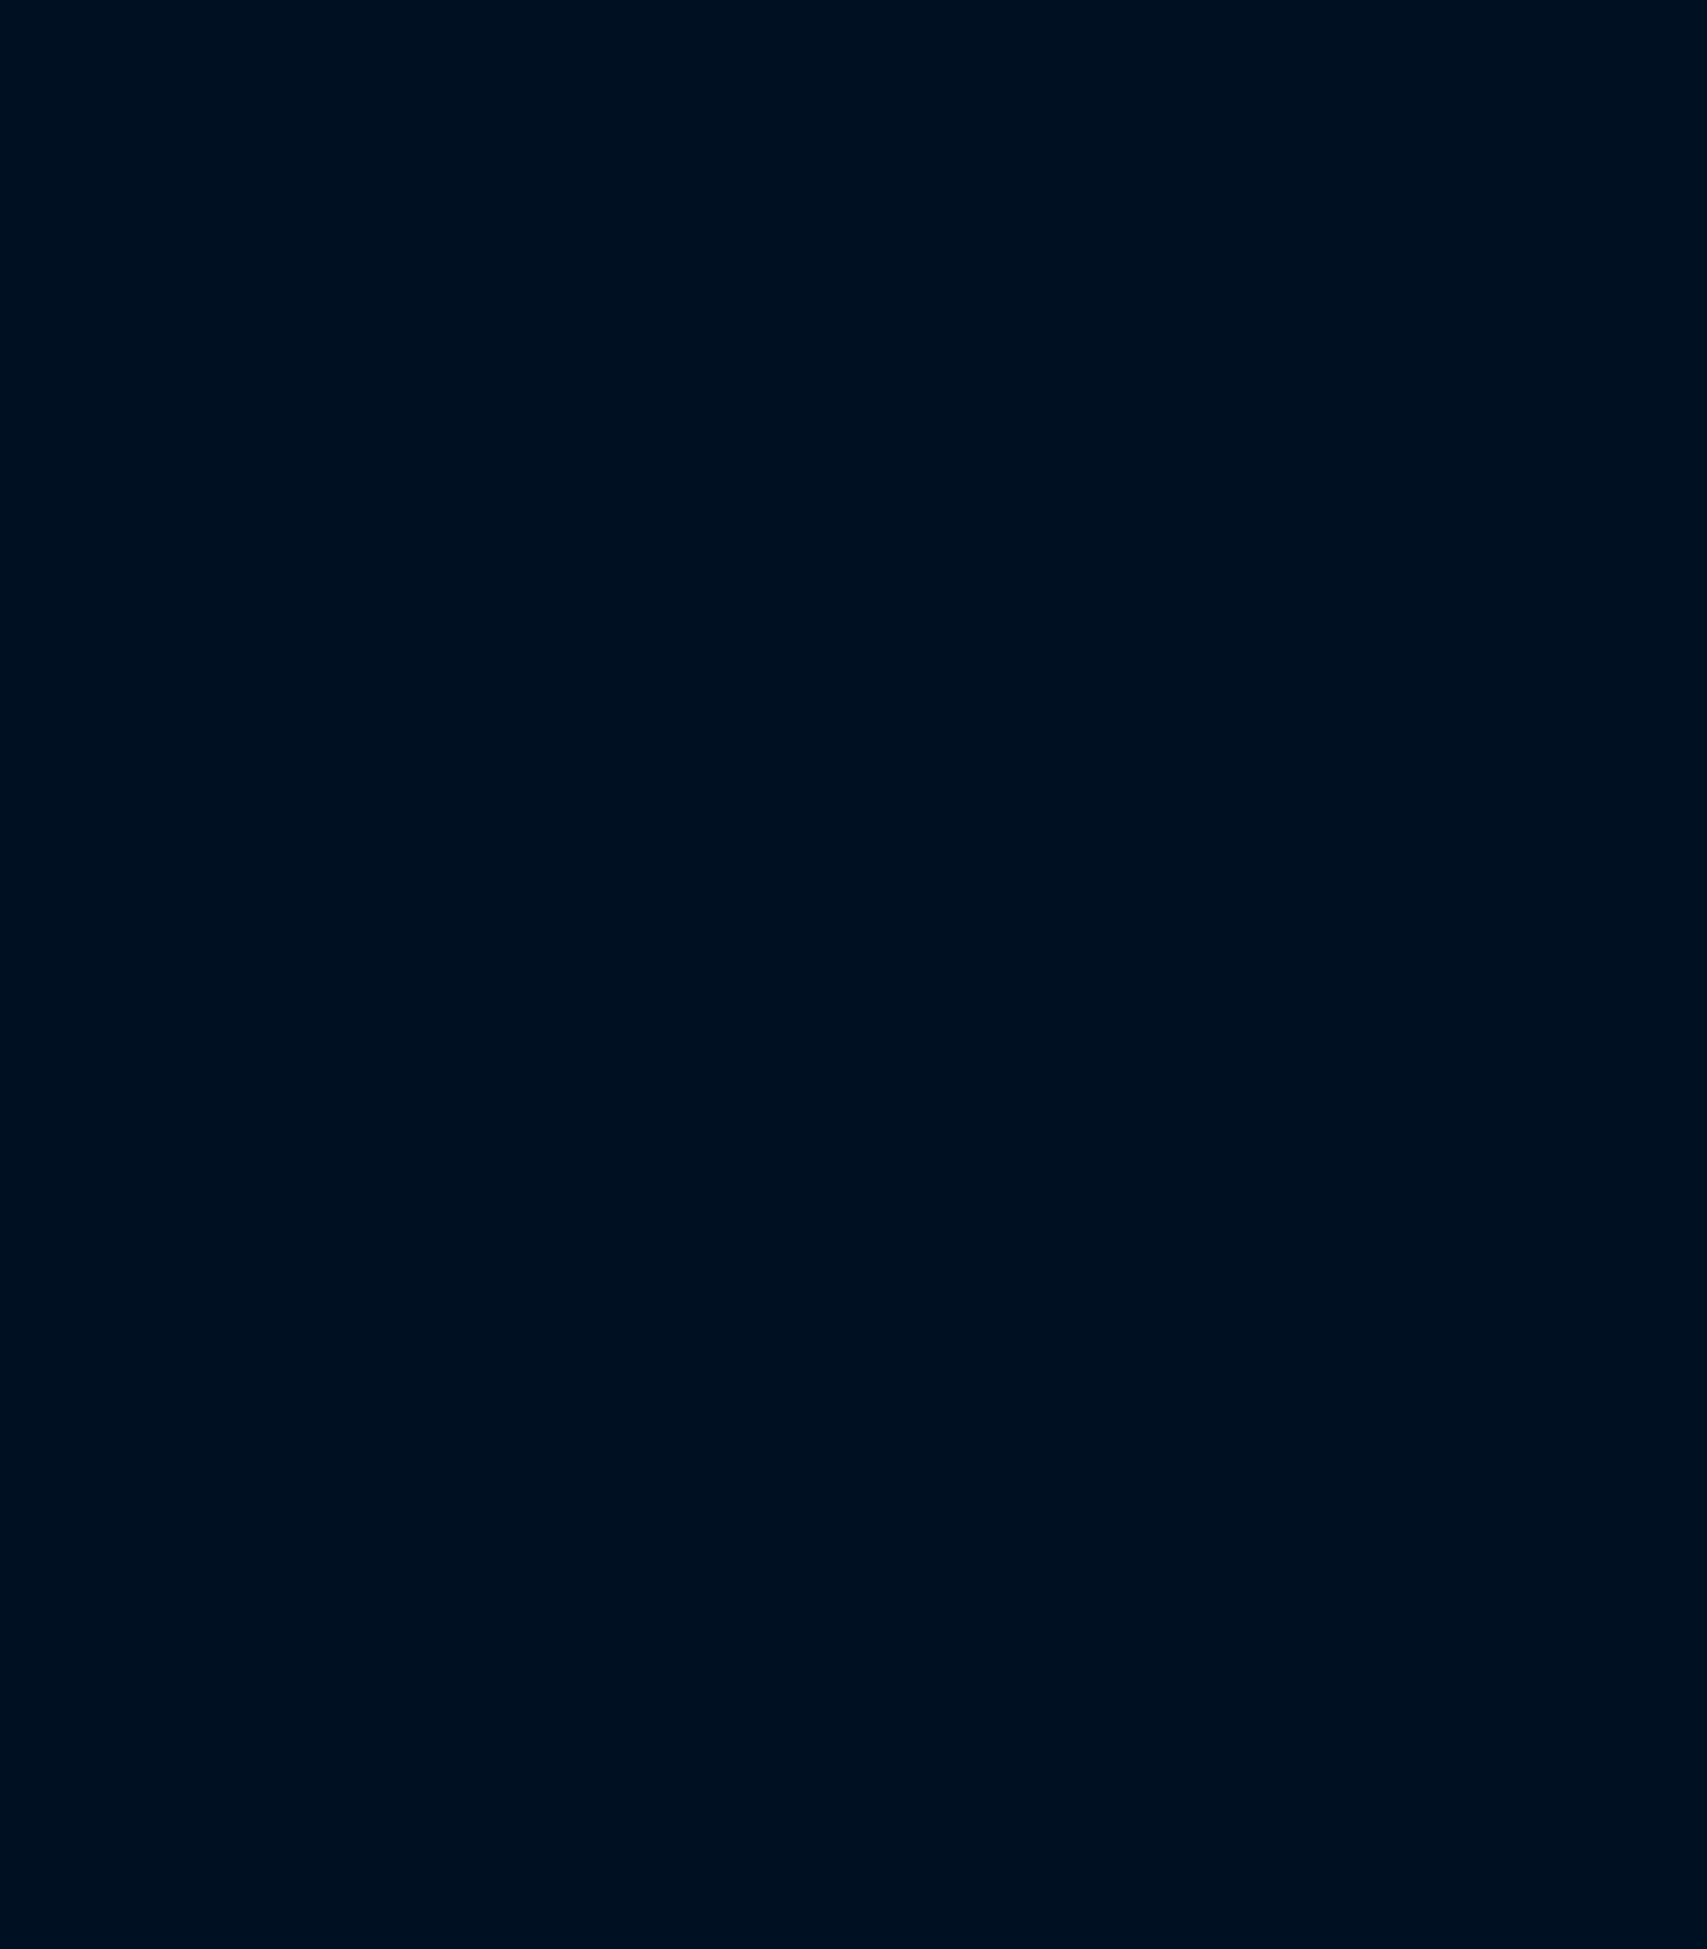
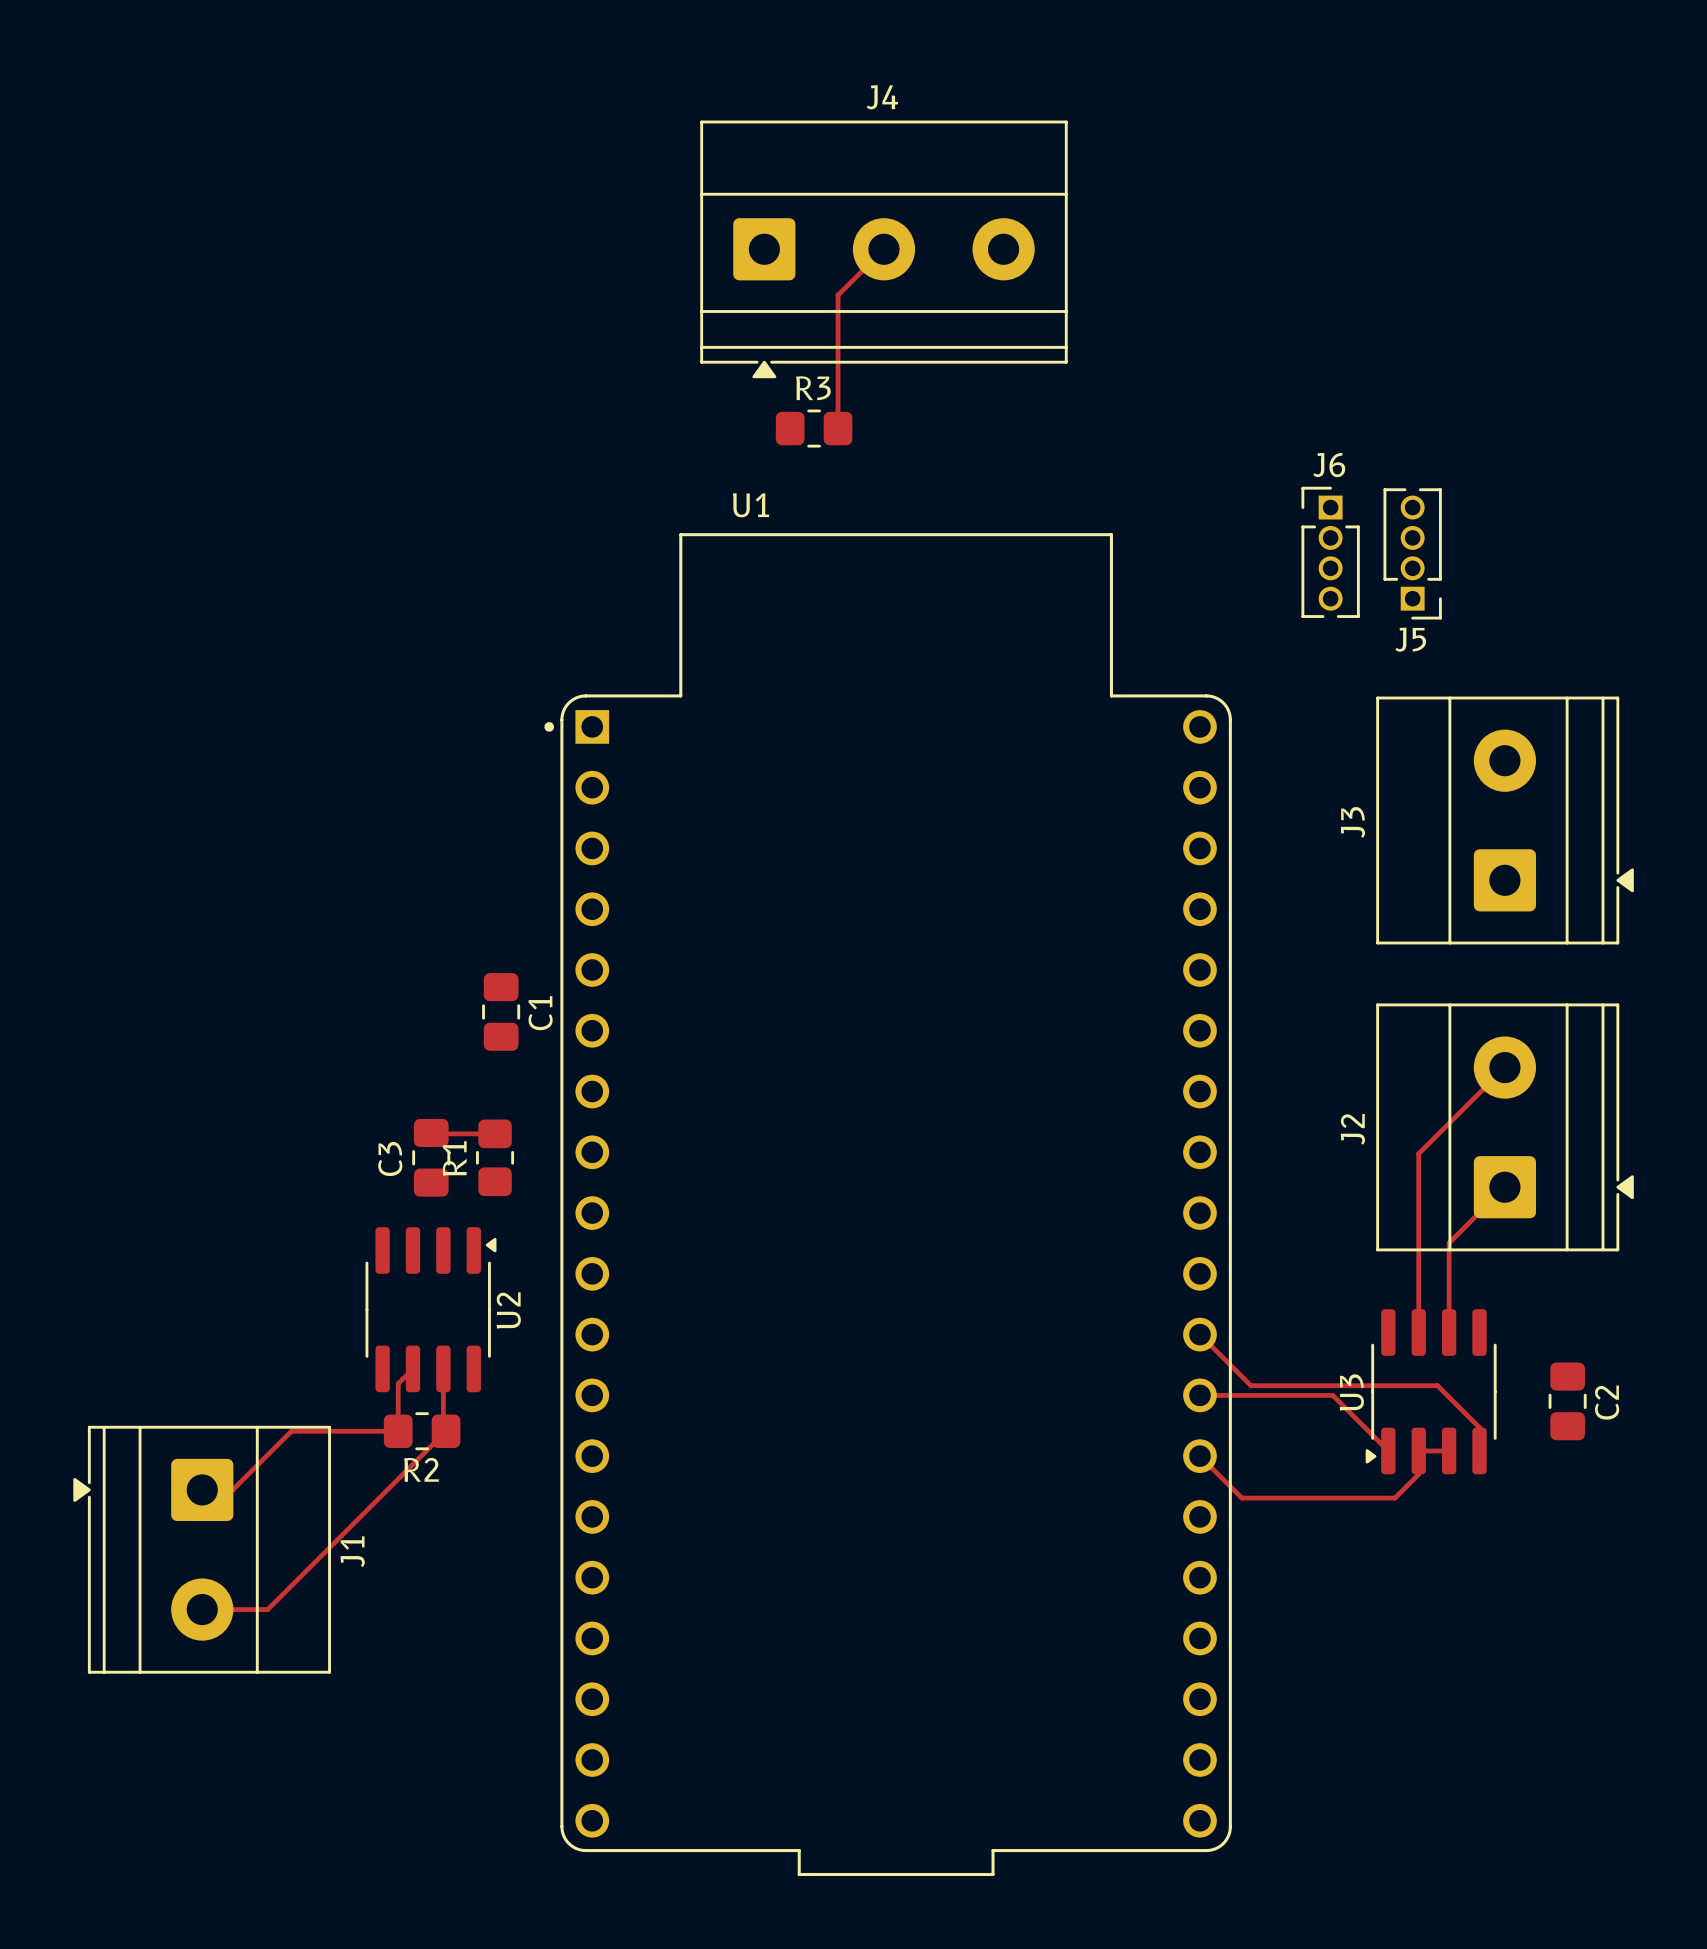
track: none -> (883, 249) (838, 295) (838, 428)
J4: none -> (883, 249)
R3: none -> (814, 428)
J6: none -> (1330, 552)
J5: none -> (1412, 553)
J3: none -> (1505, 820)
C1: none -> (501, 1011)
track: none -> (1504, 1067) (1418, 1153) (1418, 1332)
J2: none -> (1505, 1127)
track: none -> (431, 1132) (495, 1133)
C3: none -> (431, 1157)
R1: none -> (495, 1157)
track: none -> (1504, 1187) (1449, 1242) (1449, 1332)
U1: none -> (888, 1204)
U2: none -> (431, 1309)
track: none -> (1199, 1334) (1251, 1385) (1437, 1385) (1479, 1427) (1479, 1450)
track: none -> (413, 1368) (398, 1383) (398, 1431) (291, 1431) (232, 1489) (202, 1489)
track: none -> (443, 1368) (443, 1428) (446, 1431) (267, 1609) (202, 1609)
U3: none -> (1431, 1391)
track: none -> (1199, 1395) (1332, 1395) (1388, 1450)
C2: none -> (1567, 1401)
R2: none -> (422, 1431)
track: none -> (1199, 1456) (1241, 1498) (1394, 1498) (1418, 1474) (1418, 1450) (1449, 1450) (1449, 1470)
J1: none -> (202, 1549)

